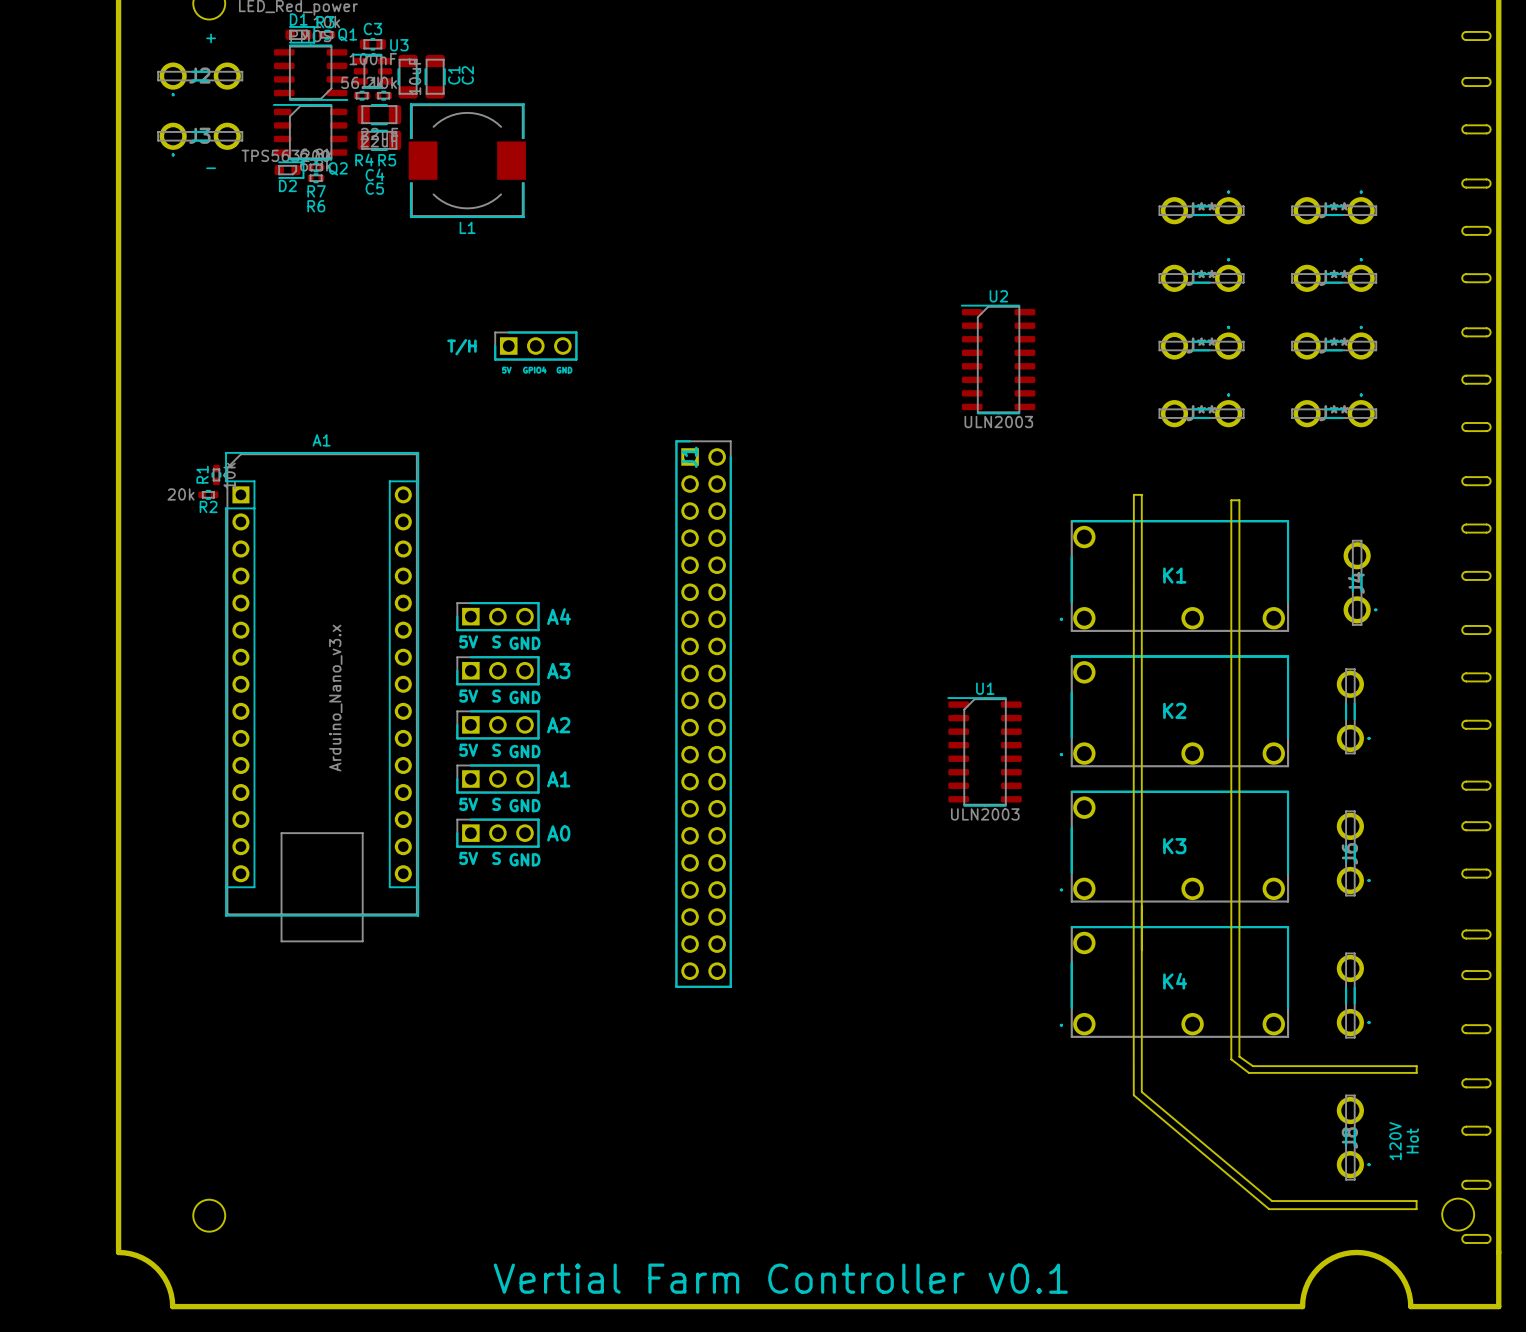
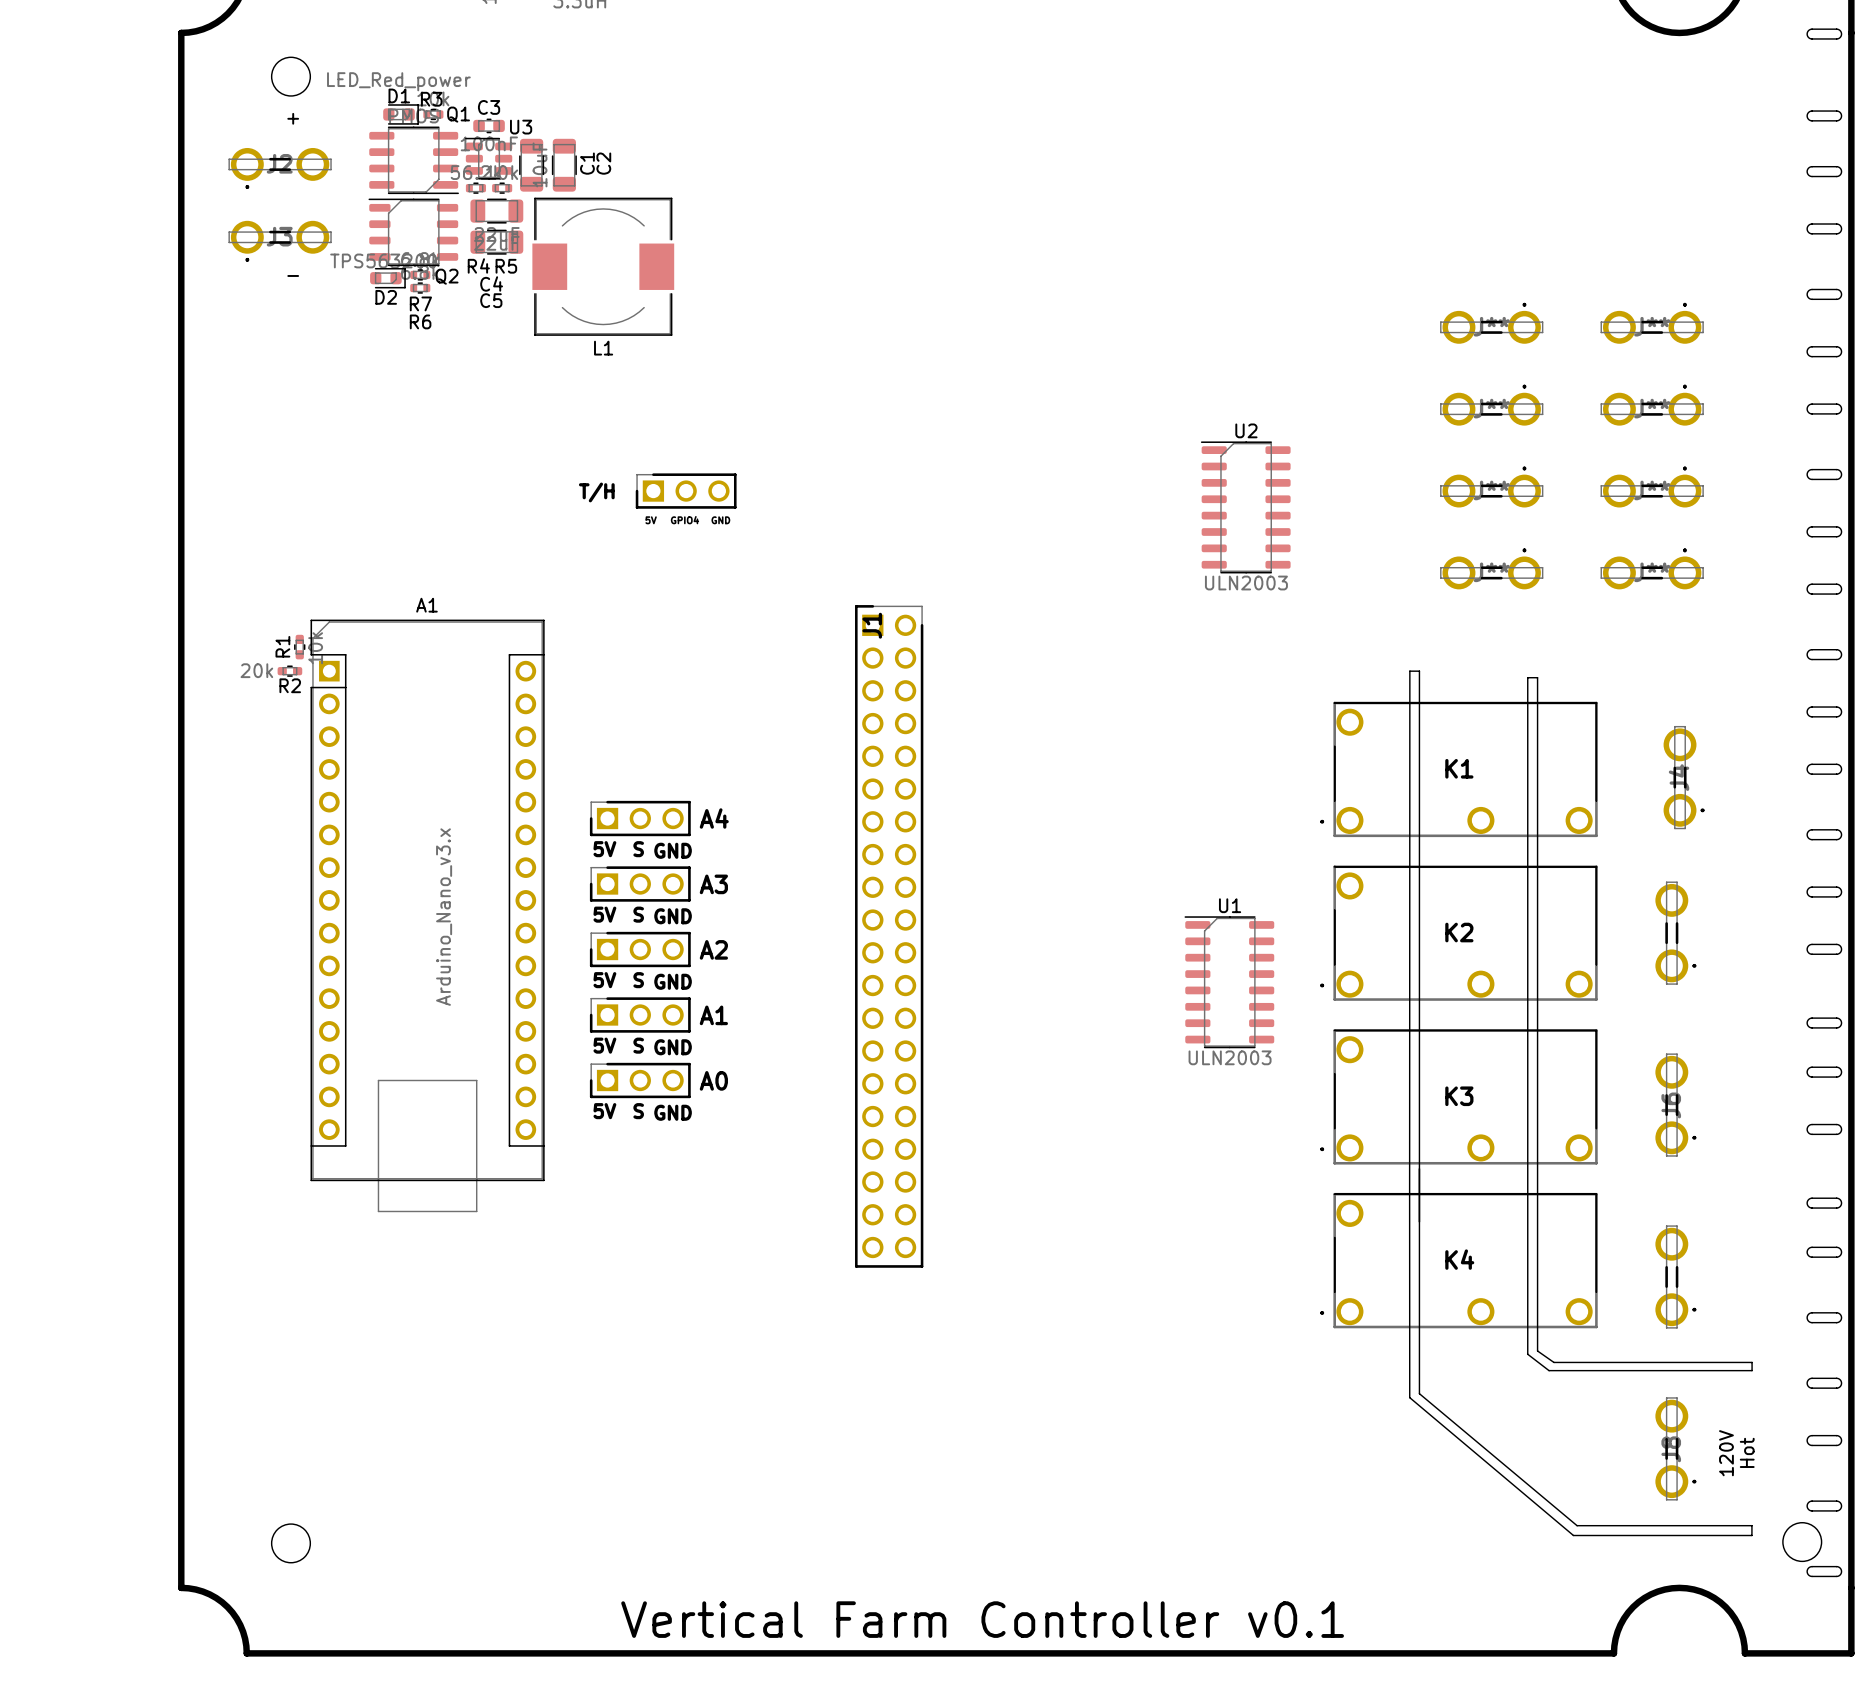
text: Vertial Farm Controller v0.1 (780, 1278) -> Vertical Farm Controller v0.1 (982, 1619)

